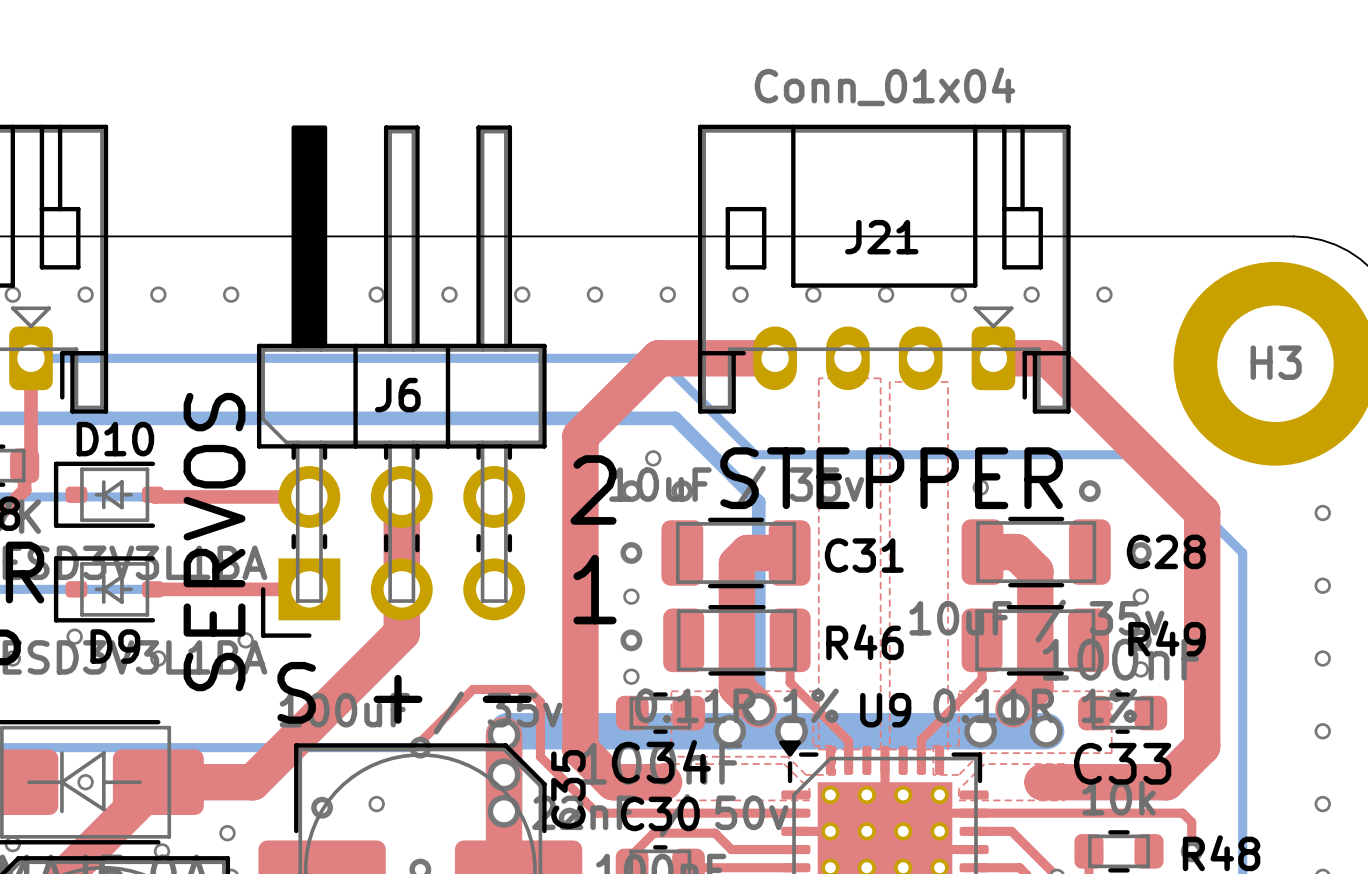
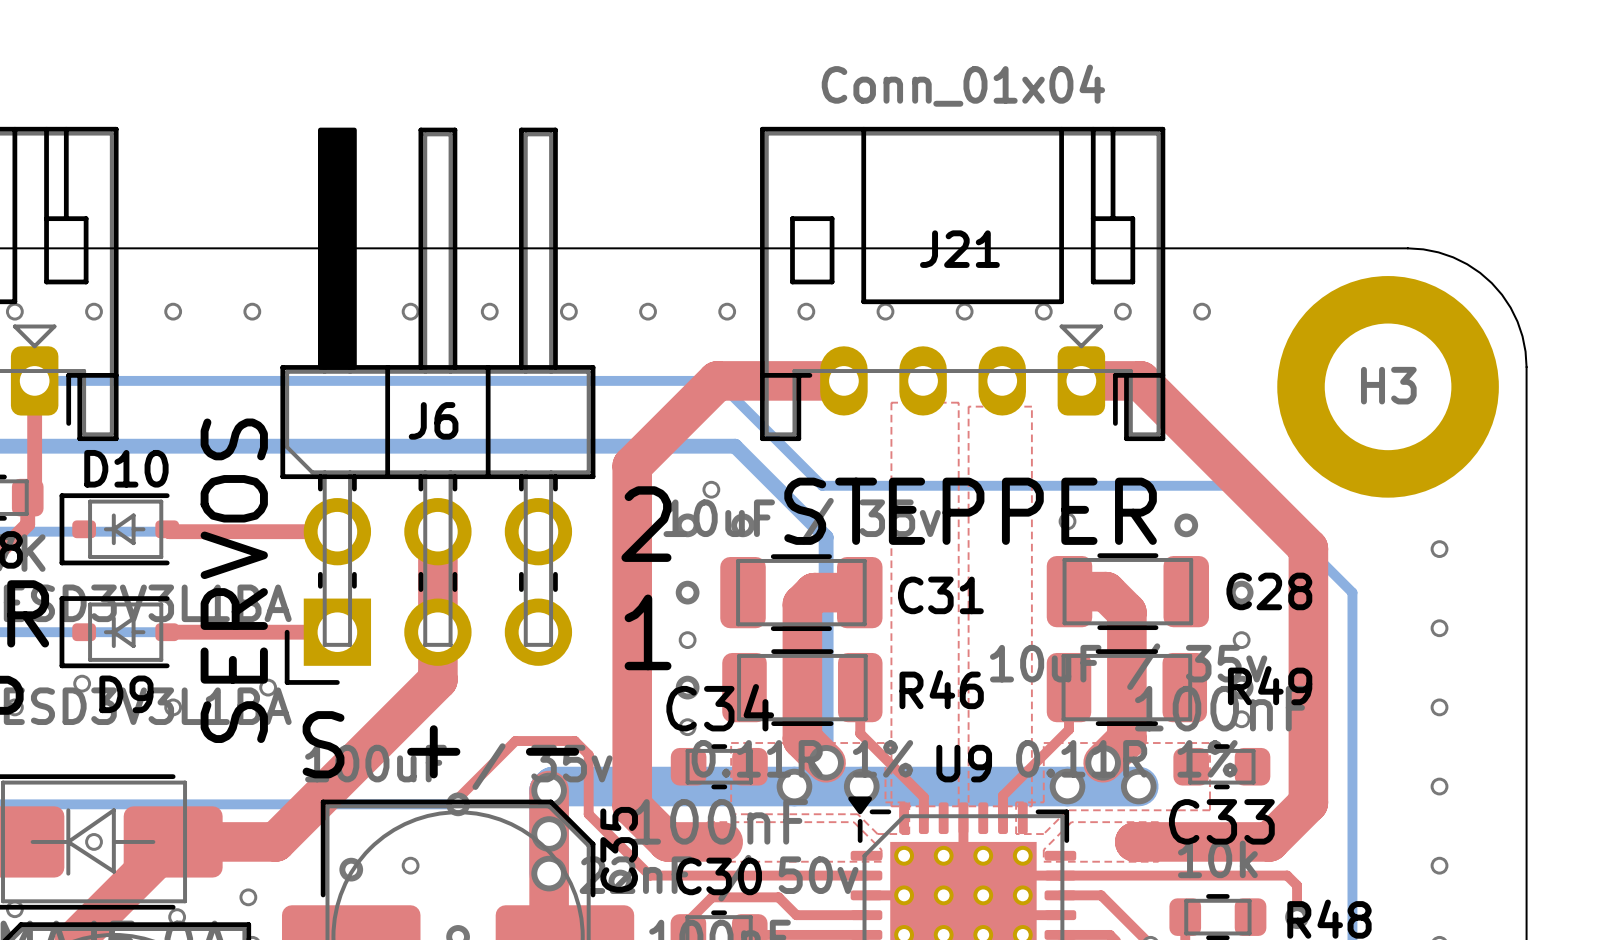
C34 name position: C34 (661, 761) -> C34 (720, 707)

